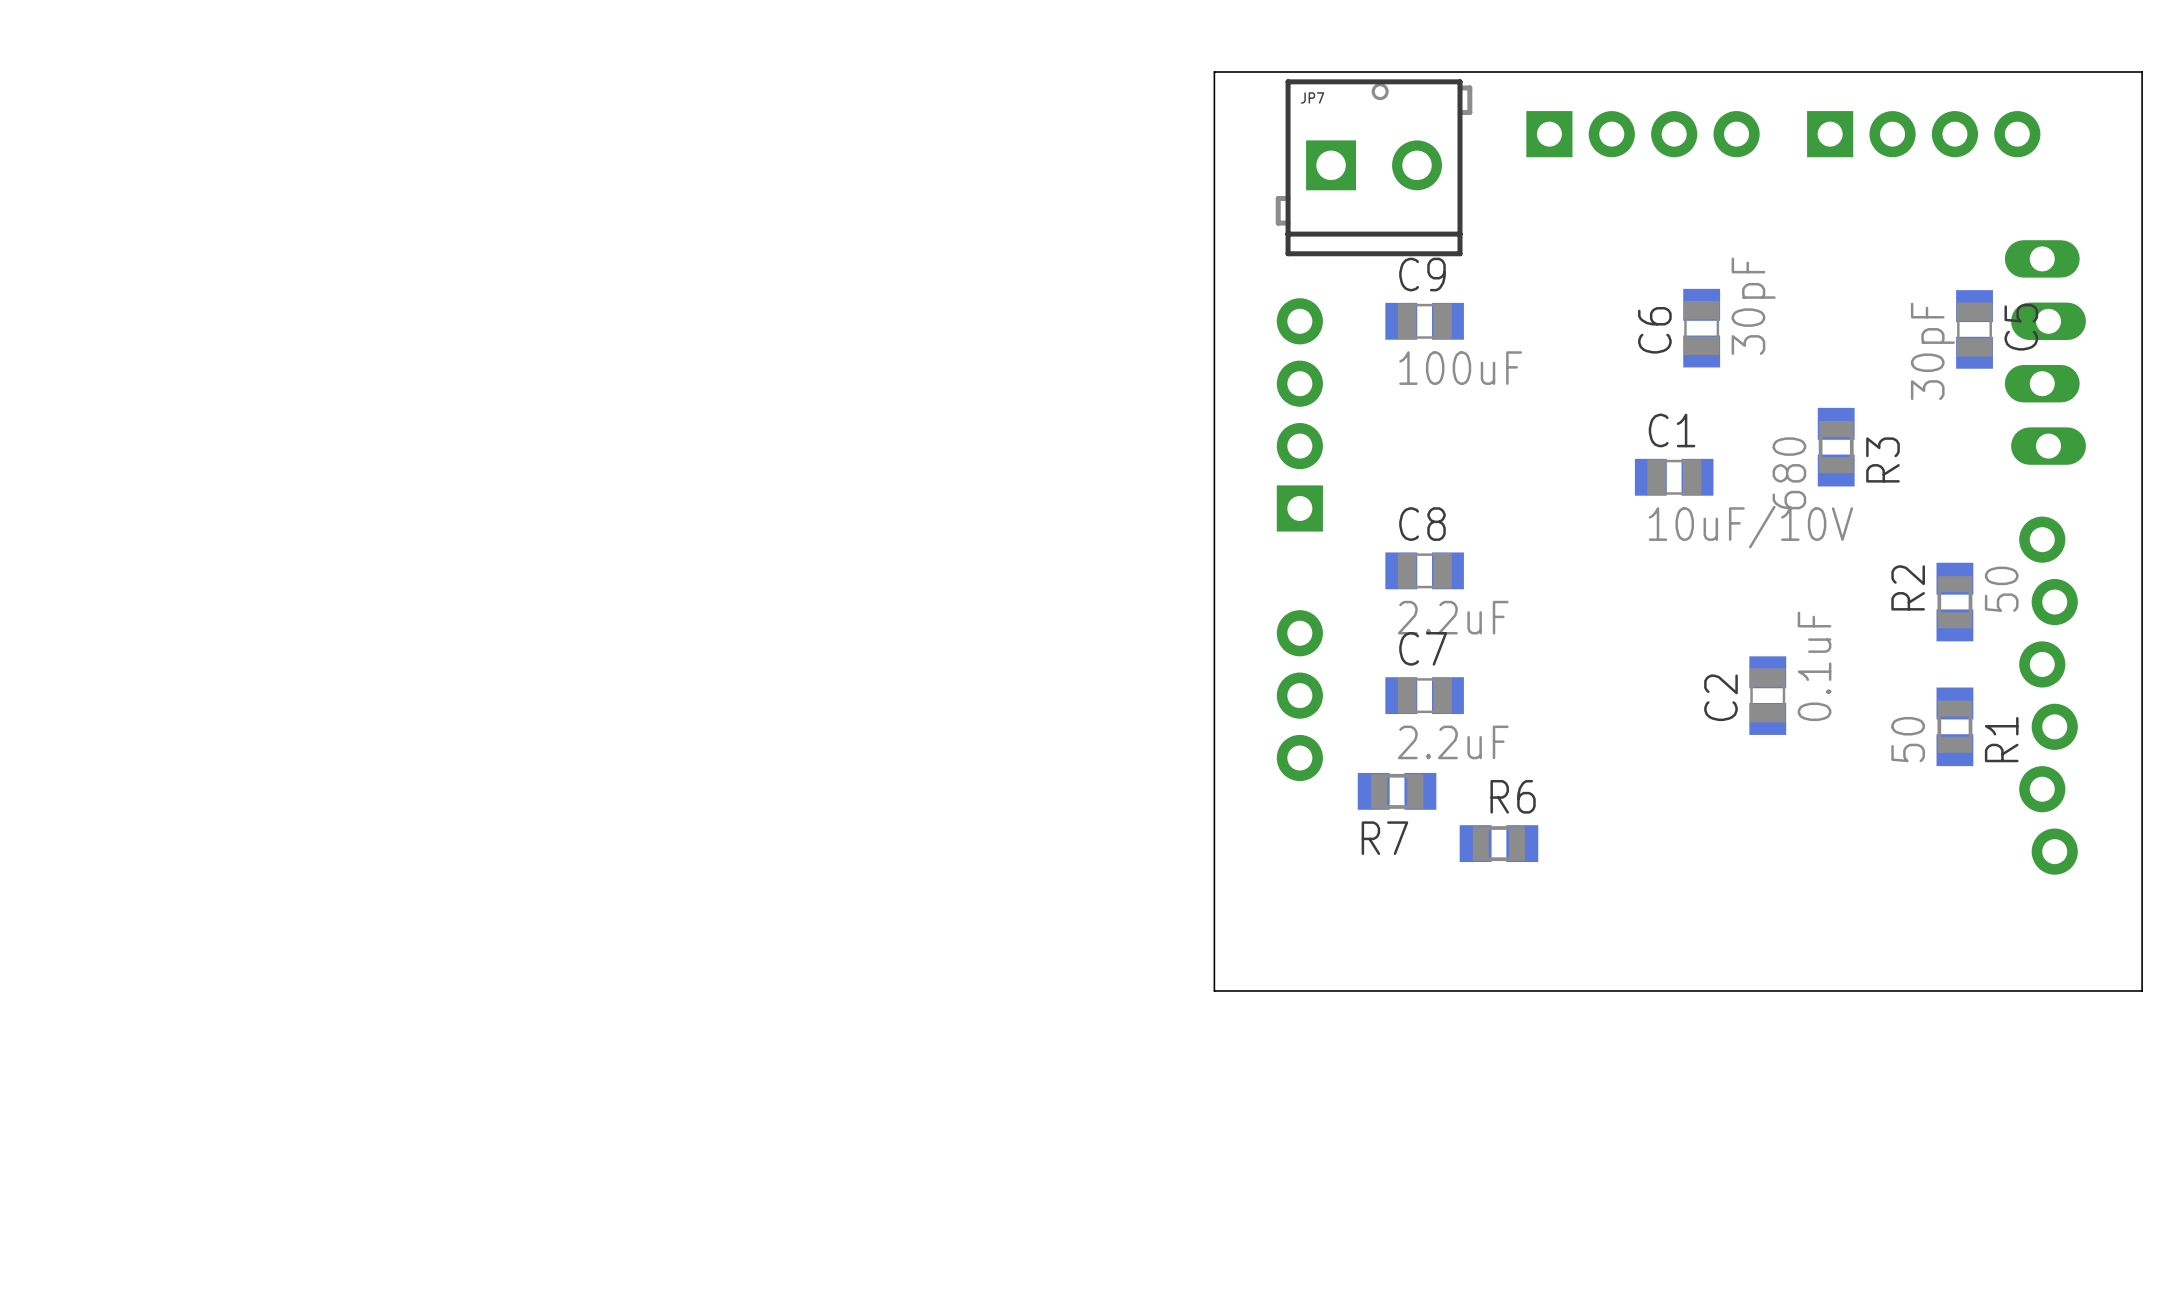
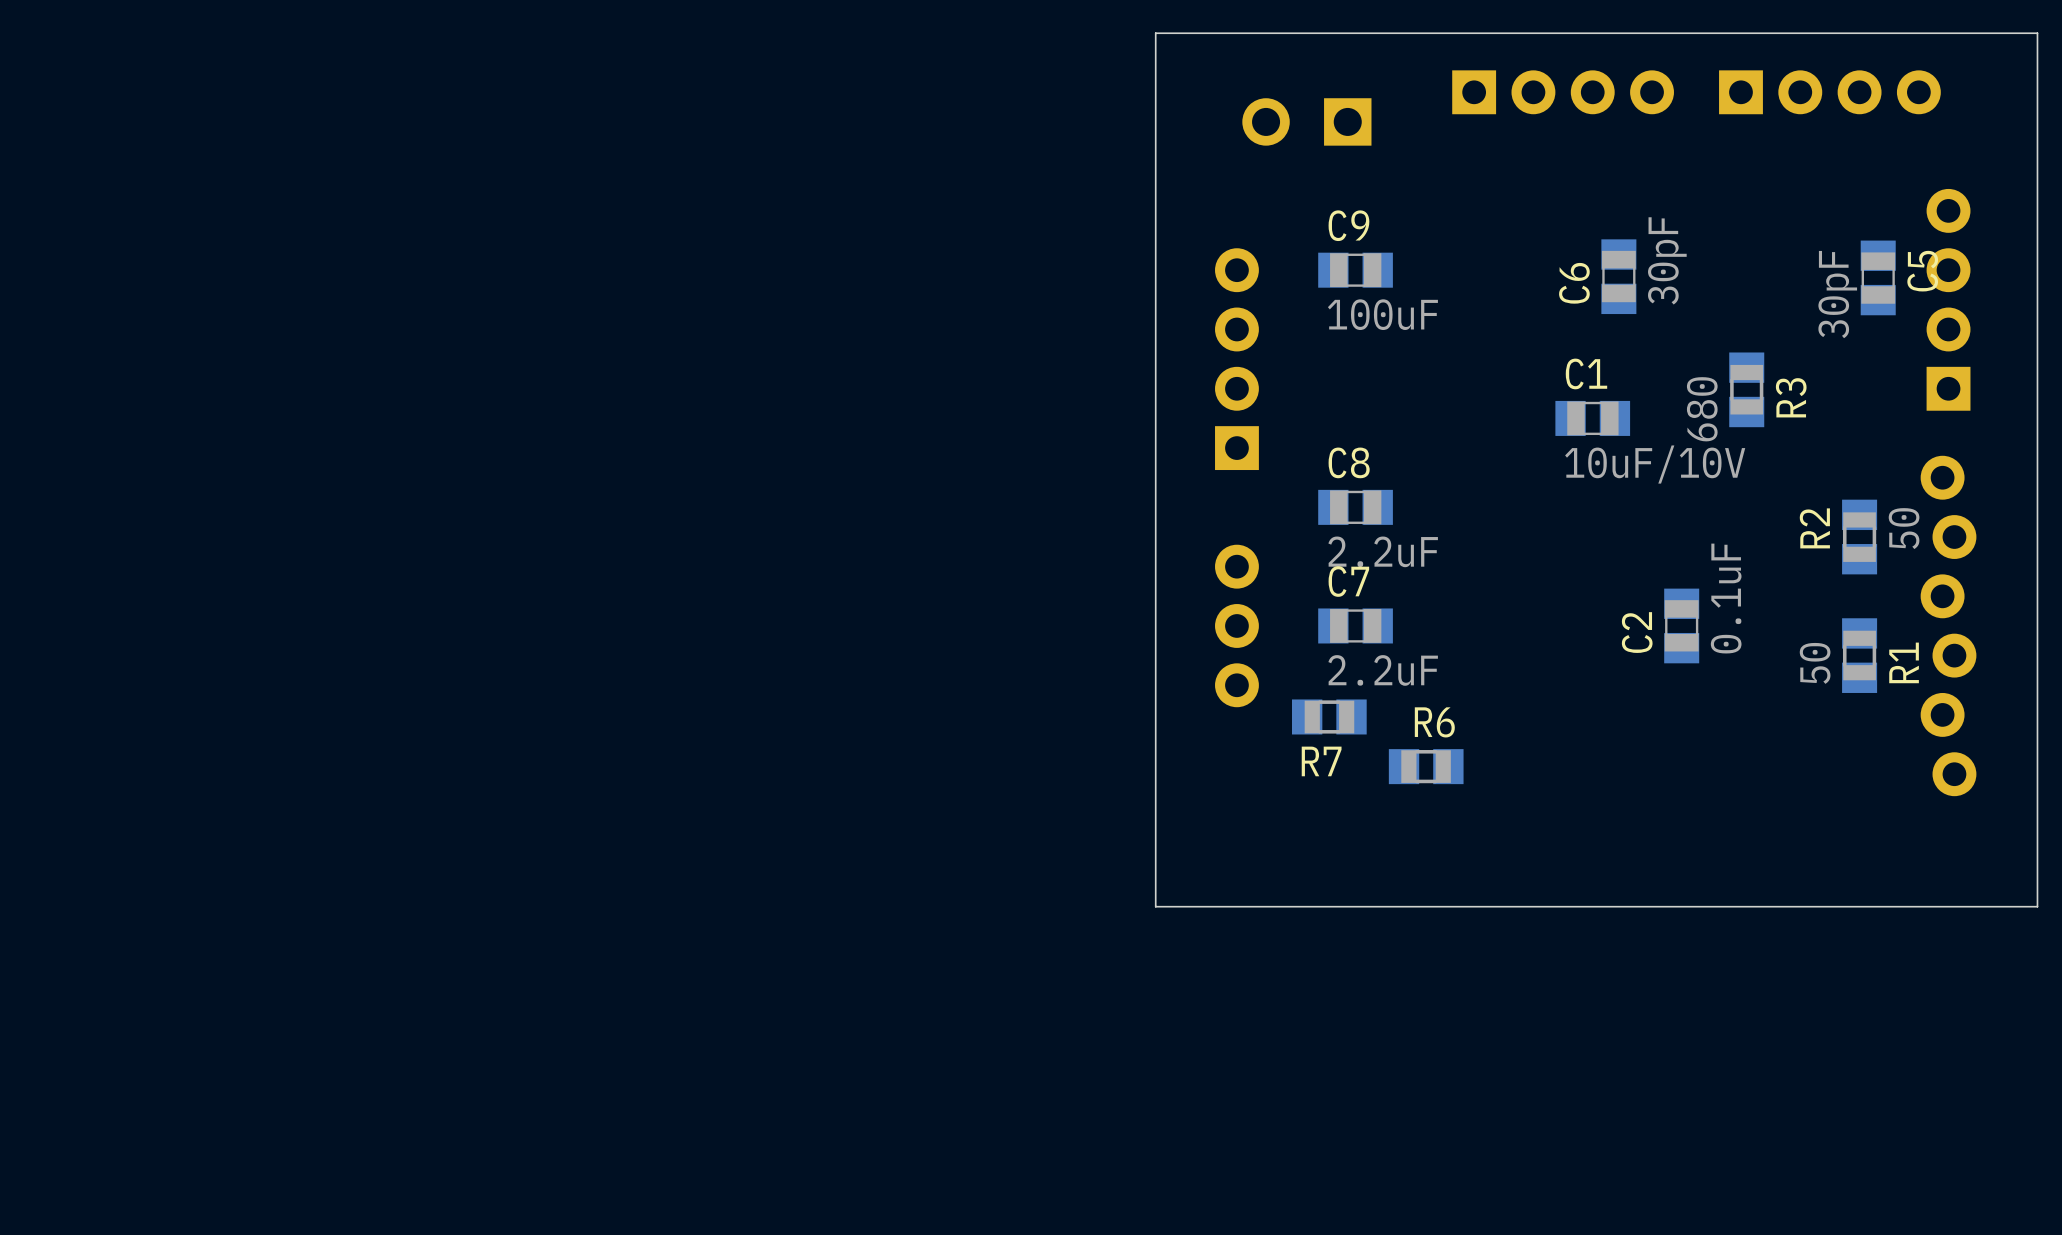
JP7 side: bottom (1374, 167) -> top (1306, 121)
part footprint: [2004, 240, 2086, 465] -> [1926, 188, 1971, 411]

